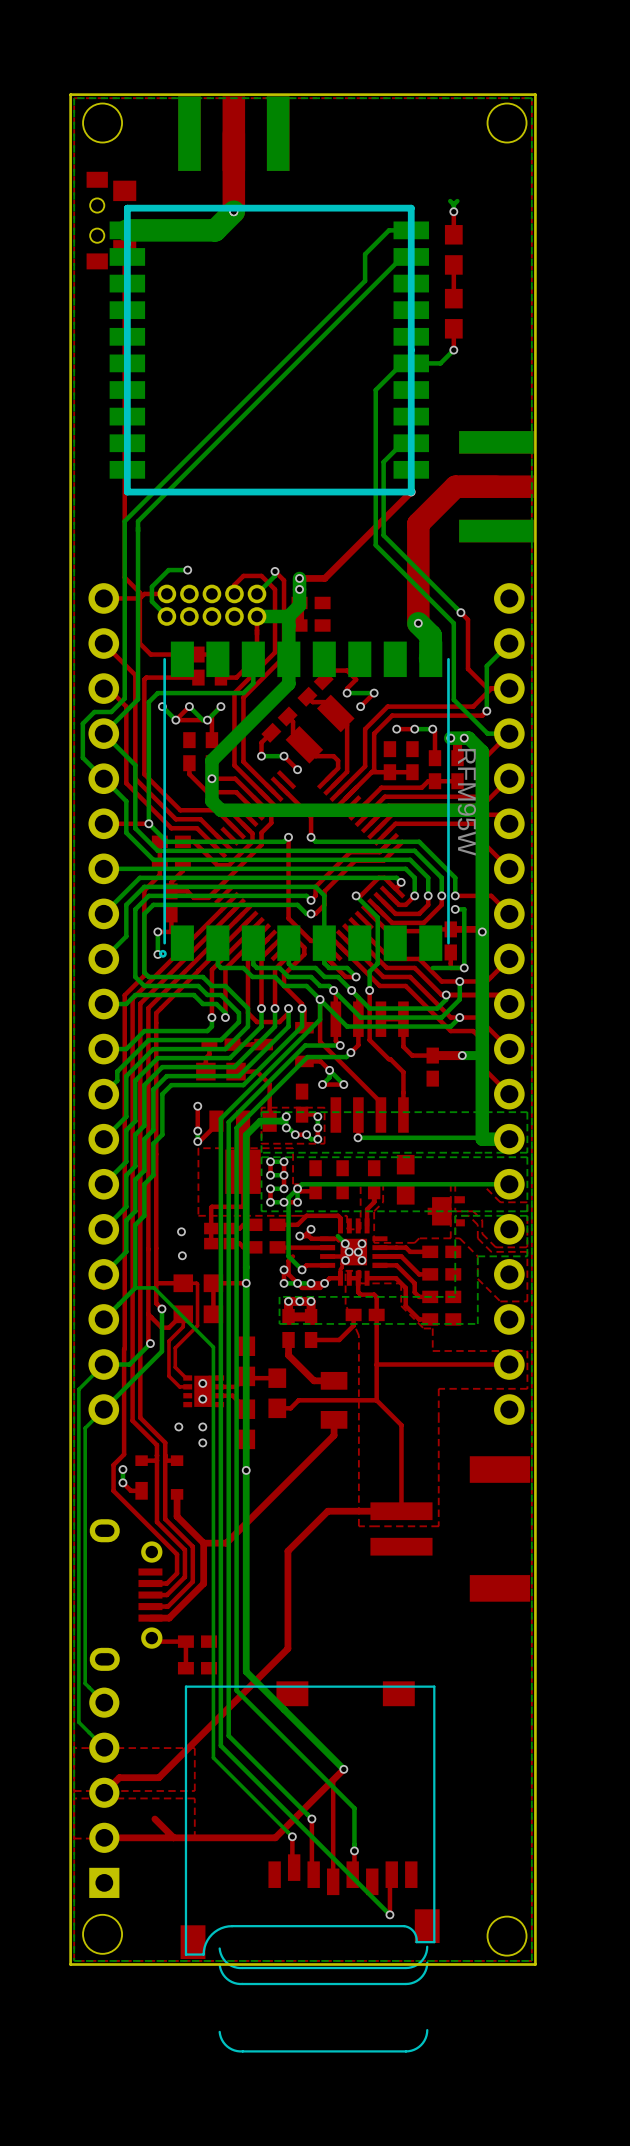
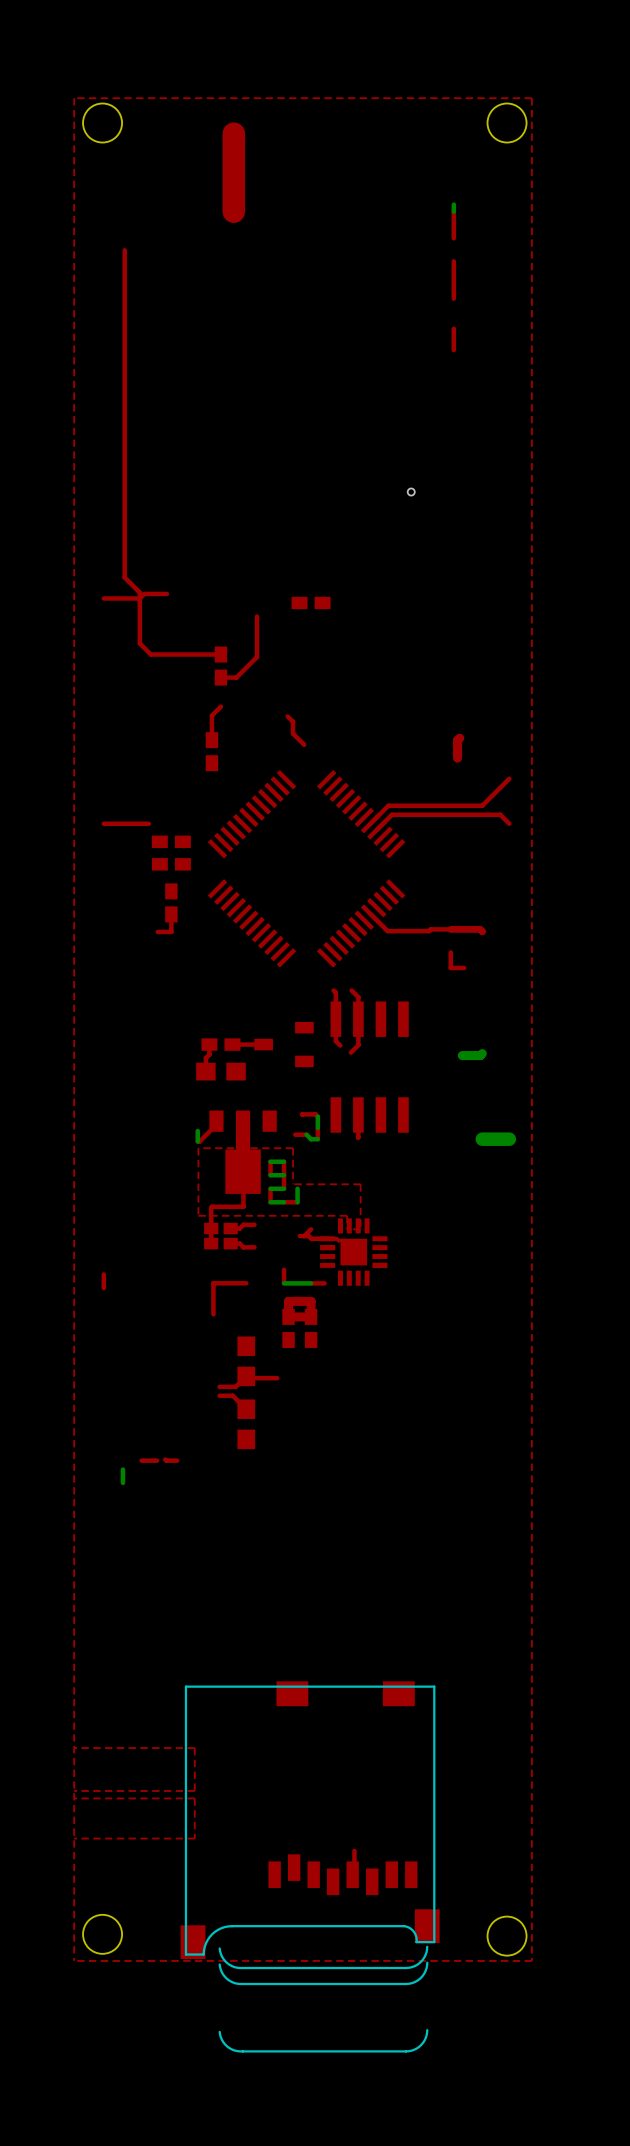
board edge: (535, 94) (535, 1964) (70, 1964) (70, 94) (535, 94) -> none
bottom zone outline: (531, 98) (74, 98) (74, 1960) (531, 1960) (531, 98) -> none
part: (233, 133) -> none
bottom track: (457, 201) (453, 204) (450, 201) -> none
bottom track: (233, 211) (215, 230) (127, 230) -> none
via: (233, 211) -> none
via: (453, 211) -> none
part: (111, 220) -> none
bottom track: (411, 230) (389, 230) (365, 254) (365, 280) (124, 521) (124, 698) (111, 712) (94, 712) (82, 723) (82, 757) (126, 801) (126, 832) (153, 859) (410, 859) (428, 877) (428, 895) -> none
part: (453, 249) -> none
bottom track: (411, 256) (402, 256) (138, 521) (138, 699) (103, 733) (135, 765) (135, 828) (157, 850) (414, 850) (441, 877) (441, 895) -> none
part: (453, 313) -> none
part: (269, 350) -> none
bottom track: (453, 350) (440, 363) (402, 363) (375, 390) (375, 545) (453, 623) (453, 699) (487, 733) (509, 733) -> none
via: (453, 350) -> none
bottom track: (408, 445) (411, 443) (402, 443) (383, 462) (383, 535) (460, 612) -> none
top track: (496, 486) (455, 486) (418, 523) (418, 623) -> none
part: (496, 486) -> none
top track: (411, 492) (324, 578) (299, 578) (299, 625) -> none
bottom track: (187, 570) (168, 570) (151, 586) (151, 601) (166, 616) -> none
via: (187, 570) -> none
top track: (275, 571) (284, 580) (284, 657) (243, 697) (243, 761) (273, 792) -> none
bottom track: (275, 571) (275, 575) (257, 593) -> none
via: (275, 571) -> none
bottom track: (299, 578) (299, 605) (288, 616) (288, 683) (211, 760) -> none
via: (299, 578) -> none
via: (299, 589) -> none
top track: (234, 593) (234, 584) (243, 575) (261, 575) (275, 589) (275, 652) (234, 693) (234, 765) (267, 798) -> none
part: (211, 605) -> none
top track: (460, 612) (468, 619) (468, 668) (487, 688) (509, 688) -> none
via: (460, 612) -> none
bottom track: (288, 616) (257, 616) -> none
bottom track: (418, 623) (430, 635) (430, 658) -> none
via: (418, 623) -> none
part: (311, 625) -> none
top track: (103, 643) (135, 675) (135, 778) (175, 819) (200, 819) (223, 842) -> none
bottom track: (509, 643) (486, 666) (486, 711) -> none
bottom track: (253, 659) (253, 683) (243, 693) (157, 693) (148, 702) (148, 823) (166, 841) (284, 841) (288, 837) -> none
part: (198, 666) -> none
top track: (198, 677) (146, 677) (144, 679) (144, 774) (180, 810) (216, 810) (236, 829) -> none
top track: (323, 680) (333, 670) (347, 670) (356, 679) (347, 688) (347, 693) -> none
top track: (103, 688) (108, 688) (126, 706) (126, 783) (171, 828) (197, 828) (217, 848) -> none
part: (315, 688) -> none
top track: (491, 688) (473, 706) (387, 706) (365, 729) (365, 766) (339, 792) -> none
via: (347, 693) -> none
top track: (374, 693) (360, 706) -> none
bottom track: (374, 693) (347, 693) -> none
via: (374, 693) -> none
top track: (307, 696) (312, 702) (324, 702) (347, 724) (347, 771) (332, 786) -> none
bottom track: (162, 706) (175, 720) -> none
via: (162, 706) -> none
top track: (189, 706) (175, 720) (207, 720) -> none
via: (189, 706) -> none
bottom track: (220, 706) (207, 720) (202, 720) (189, 706) -> none
via: (220, 706) -> none
via: (360, 706) -> none
top track: (486, 711) (482, 715) (392, 715) (374, 733) (374, 769) (345, 798) -> none
via: (486, 711) -> none
via: (175, 720) -> none
via: (207, 720) -> none
part: (279, 724) -> none
part: (320, 729) -> none
via: (396, 729) -> none
top track: (414, 729) (396, 729) -> none
via: (414, 729) -> none
top track: (432, 729) (434, 731) (434, 758) -> none
bottom track: (432, 729) (414, 729) -> none
via: (432, 729) -> none
top track: (271, 732) (261, 742) (261, 756) -> none
top track: (509, 733) (486, 756) (486, 787) (477, 796) (384, 796) (364, 817) -> none
bottom track: (450, 738) (468, 738) (482, 751) (482, 1139) (482, 931) -> none
via: (450, 738) -> none
via: (464, 738) -> none
top track: (304, 744) (315, 756) (333, 756) (338, 760) (338, 768) (326, 779) -> none
part: (189, 751) -> none
via: (261, 756) -> none
top track: (284, 756) (297, 769) -> none
bottom track: (284, 756) (261, 756) -> none
via: (284, 756) -> none
bottom track: (211, 760) (211, 801) (220, 810) (482, 810) -> none
part: (389, 760) -> none
part: (412, 760) -> none
top track: (189, 763) (189, 774) (207, 792) (236, 792) (255, 811) -> none
via: (297, 769) -> none
part: (434, 769) -> none
part: (457, 769) -> none
top track: (412, 772) (371, 772) -> none
top track: (211, 774) (211, 763) (211, 778) (235, 778) (271, 814) (271, 822) (261, 832) (261, 844) (208, 897) (193, 897) (187, 891) (171, 891) (171, 882) (182, 870) (182, 864) -> none
via: (211, 778) -> none
top track: (457, 781) (428, 781) (421, 787) (381, 787) (358, 811) -> none
top track: (280, 786) (311, 816) (311, 837) -> none
part: RFM95W (304, 801) -> none
via: (148, 823) -> none
top track: (242, 823) (252, 833) (252, 841) (229, 865) (217, 865) (193, 841) (182, 841) -> none
top track: (383, 836) (395, 823) (482, 823) (486, 828) (486, 846) (509, 868) -> none
top track: (288, 837) (288, 918) (311, 940) (322, 940) (332, 951) -> none
via: (288, 837) -> none
bottom track: (311, 837) (315, 841) (419, 841) (455, 877) (455, 895) -> none
via: (311, 837) -> none
top track: (159, 841) (159, 875) (144, 890) (144, 975) (124, 995) (124, 1454) (113, 1465) (113, 1490) (177, 1554) (177, 1573) (166, 1583) (150, 1583) -> none
top track: (389, 842) (379, 852) (350, 852) (315, 886) (315, 895) (311, 900) -> none
top track: (395, 848) (383, 860) (355, 860) (324, 891) (324, 904) (315, 913) (311, 913) -> none
bottom track: (103, 868) (405, 868) (414, 877) (414, 895) -> none
top track: (401, 882) (395, 888) (384, 877) (378, 877) (360, 895) (356, 895) -> none
bottom track: (401, 882) (396, 877) (139, 877) (103, 913) -> none
via: (401, 882) -> none
bottom track: (356, 895) (377, 917) (377, 963) (369, 971) (369, 990) -> none
via: (356, 895) -> none
top track: (389, 895) (399, 904) (405, 904) (414, 895) -> none
via: (414, 895) -> none
top track: (428, 895) (428, 904) (419, 913) (395, 913) (383, 901) -> none
via: (428, 895) -> none
top track: (441, 895) (441, 904) (423, 922) (392, 922) (377, 907) -> none
via: (441, 895) -> none
top track: (455, 895) (491, 895) (509, 913) -> none
via: (455, 895) -> none
bottom track: (311, 900) (306, 895) (148, 895) (135, 909) (135, 976) (144, 985) (198, 985) (207, 995) (220, 995) (238, 1013) (238, 1022) (220, 1040) (148, 1040) (117, 1071) (117, 1080) (103, 1094) -> none
via: (311, 900) -> none
top track: (230, 901) (132, 998) (132, 1420) (156, 1445) (156, 1522) (184, 1549) (184, 1577) (166, 1595) (150, 1595) -> none
top track: (236, 907) (140, 1003) (140, 1417) (165, 1442) (165, 1519) (192, 1546) (192, 1581) (167, 1606) (150, 1606) -> none
bottom track: (455, 909) (464, 909) (464, 967) (432, 967) -> none
via: (455, 909) -> none
top track: (242, 913) (148, 1008) (148, 1341) (150, 1343) -> none
bottom track: (311, 913) (306, 913) (297, 904) (153, 904) (144, 913) (144, 972) (148, 976) (202, 976) (211, 985) (225, 985) (247, 1008) (247, 1026) (225, 1049) (153, 1049) (126, 1076) (126, 1116) (103, 1139) (103, 1130) -> none
via: (311, 913) -> none
top track: (248, 920) (156, 1013) (156, 1303) (161, 1308) -> none
top track: (255, 926) (211, 969) (211, 1017) -> none
top track: (358, 926) (390, 958) (419, 958) (441, 981) (486, 981) (509, 958) -> none
bottom track: (157, 931) (157, 954) -> none
via: (157, 931) -> none
via: (482, 931) -> none
top track: (261, 932) (225, 968) (225, 1017) -> none
top track: (351, 932) (386, 967) (414, 967) (441, 995) (504, 995) -> none
top track: (267, 939) (247, 958) (247, 1013) (257, 1022) (279, 1022) (288, 1013) (288, 1008) -> none
top track: (345, 939) (383, 976) (410, 976) (450, 1017) (477, 1017) (509, 1049) -> none
part: (450, 940) -> none
bottom track: (217, 943) (217, 964) (220, 967) (243, 967) (252, 976) (275, 976) (284, 985) (306, 985) (347, 1026) (450, 1026) (459, 1017) -> none
bottom track: (253, 943) (253, 964) (257, 967) (279, 967) (288, 976) (311, 976) (320, 985) (329, 985) (360, 1017) (441, 1017) (459, 999) (459, 981) -> none
bottom track: (288, 943) (288, 963) (293, 967) (315, 967) (324, 976) (338, 976) (369, 1008) (437, 1008) (446, 999) (446, 995) -> none
top track: (273, 945) (261, 957) (261, 1008) -> none
top track: (339, 945) (379, 985) (405, 985) (450, 1031) (473, 1031) (486, 1044) (486, 1071) (509, 1094) -> none
top track: (280, 951) (290, 940) (297, 940) (304, 947) (304, 954) (284, 974) (284, 985) (302, 1004) (304, 1010) (304, 1027) -> none
bottom track: (103, 954) (103, 958) (126, 936) (126, 904) (144, 886) (315, 886) (324, 895) (324, 963) (329, 967) (347, 967) (356, 976) -> none
via: (157, 954) -> none
top track: (286, 957) (275, 969) (275, 1008) -> none
top track: (326, 957) (345, 976) (356, 976) -> none
via: (464, 967) -> none
via: (356, 976) -> none
via: (459, 981) -> none
via: (333, 990) -> none
via: (351, 990) -> none
top track: (369, 990) (369, 1040) (403, 1072) (403, 1115) -> none
via: (369, 990) -> none
via: (446, 995) -> none
top track: (320, 999) (320, 1041) (380, 1102) (380, 1115) -> none
bottom track: (320, 999) (320, 1019) (220, 1118) (220, 1745) (389, 1914) -> none
via: (320, 999) -> none
bottom track: (103, 1004) (126, 1004) (135, 995) (193, 995) (202, 1004) (216, 1004) (225, 1013) (225, 1017) -> none
part: (103, 1004) -> none
part: (509, 1004) -> none
bottom track: (261, 1008) (261, 1026) (229, 1058) (157, 1058) (135, 1080) (135, 1121) (126, 1130) (126, 1161) (103, 1184) (103, 1179) -> none
via: (261, 1008) -> none
bottom track: (275, 1008) (275, 1026) (234, 1067) (162, 1067) (144, 1085) (144, 1125) (135, 1134) (135, 1166) (126, 1175) (126, 1206) (103, 1229) -> none
via: (275, 1008) -> none
bottom track: (288, 1008) (288, 1026) (238, 1076) (166, 1076) (153, 1089) (153, 1130) (144, 1139) (144, 1170) (135, 1179) (135, 1211) (126, 1220) (126, 1251) (103, 1274) -> none
via: (288, 1008) -> none
bottom track: (302, 1008) (302, 1026) (243, 1085) (171, 1085) (162, 1094) (162, 1134) (153, 1143) (153, 1175) (144, 1184) (144, 1215) (135, 1224) (135, 1287) -> none
via: (302, 1008) -> none
bottom track: (211, 1017) (211, 1026) (207, 1031) (144, 1031) (126, 1049) (103, 1049) -> none
via: (211, 1017) -> none
via: (225, 1017) -> none
via: (459, 1017) -> none
top track: (380, 1019) (403, 1019) (403, 1046) (412, 1055) (462, 1055) -> none
bottom track: (340, 1045) (305, 1045) (228, 1122) (228, 1735) (311, 1819) -> none
via: (340, 1045) -> none
bottom track: (350, 1052) (346, 1057) (307, 1057) (236, 1127) (236, 1690) (354, 1808) (354, 1850) -> none
via: (350, 1052) -> none
via: (462, 1055) -> none
top track: (304, 1061) (320, 1061) (329, 1070) -> none
part: (432, 1067) -> none
via: (329, 1070) -> none
top track: (236, 1071) (257, 1071) (269, 1084) (269, 1121) -> none
via: (322, 1084) -> none
top track: (343, 1084) (322, 1084) -> none
bottom track: (343, 1084) (329, 1070) (329, 1077) (322, 1084) -> none
via: (343, 1084) -> none
part: (302, 1103) -> none
top track: (197, 1106) (197, 1131) -> none
via: (197, 1106) -> none
top zone outline: (324, 1107) (324, 1143) (261, 1143) (261, 1107) (324, 1107) -> none
bottom zone outline: (527, 1112) (527, 1152) (261, 1152) (261, 1112) (527, 1112) -> none
via: (286, 1116) -> none
via: (317, 1116) -> none
via: (286, 1127) -> none
via: (317, 1127) -> none
via: (197, 1131) -> none
bottom track: (295, 1134) (286, 1127) (286, 1116) (281, 1121) (260, 1121) (246, 1135) (246, 1671) (343, 1769) -> none
via: (295, 1134) -> none
via: (306, 1134) -> none
via: (358, 1137) -> none
bottom track: (507, 1137) (358, 1137) -> none
via: (317, 1139) -> none
via: (197, 1141) -> none
bottom zone outline: (527, 1157) (527, 1211) (261, 1211) (261, 1157) (527, 1157) -> none
via: (270, 1161) -> none
via: (284, 1161) -> none
via: (270, 1175) -> none
via: (284, 1175) -> none
part: (315, 1179) -> none
part: (342, 1179) -> none
part: (374, 1179) -> none
part: (405, 1179) -> none
top zone outline: (450, 1184) (383, 1184) (383, 1202) (374, 1211) (374, 1242) (414, 1242) (419, 1238) (450, 1238) (450, 1184) -> none
top zone outline: (482, 1184) (455, 1184) (455, 1211) (473, 1211) (482, 1220) (482, 1233) (495, 1247) (527, 1247) (527, 1202) (500, 1202) (482, 1184) -> none
bottom track: (509, 1184) (302, 1184) (288, 1197) (288, 1256) (302, 1269) -> none
via: (270, 1188) -> none
via: (284, 1188) -> none
top track: (297, 1188) (300, 1191) (315, 1191) -> none
via: (297, 1188) -> none
top track: (374, 1191) (374, 1202) (367, 1209) (367, 1225) -> none
via: (270, 1202) -> none
via: (284, 1202) -> none
via: (297, 1202) -> none
part: (446, 1211) -> none
top zone outline: (468, 1215) (455, 1215) (455, 1238) (459, 1238) (477, 1256) (477, 1278) (500, 1301) (527, 1301) (527, 1251) (491, 1251) (477, 1238) (477, 1224) (468, 1215) -> none
bottom zone outline: (527, 1215) (527, 1256) (477, 1256) (477, 1323) (279, 1323) (279, 1296) (455, 1296) (455, 1215) (527, 1215) -> none
part: (266, 1224) -> none
top track: (277, 1224) (297, 1224) (306, 1215) (338, 1215) (340, 1218) (340, 1225) -> none
via: (311, 1229) -> none
via: (181, 1231) -> none
via: (299, 1236) -> none
bottom track: (337, 1236) (347, 1245) -> none
via: (345, 1243) -> none
via: (361, 1243) -> none
part: (266, 1247) -> none
top track: (277, 1247) (327, 1247) -> none
top track: (379, 1247) (405, 1247) (410, 1251) (430, 1251) -> none
via: (349, 1251) -> none
part: (441, 1251) -> none
via: (358, 1252) -> none
via: (182, 1255) -> none
top track: (327, 1256) (344, 1256) (347, 1258) (342, 1263) (340, 1278) (329, 1278) (320, 1287) (302, 1287) (288, 1274) (288, 1260) (292, 1256) -> none
top track: (379, 1256) (401, 1256) (419, 1274) (430, 1274) -> none
via: (345, 1260) -> none
via: (361, 1260) -> none
top track: (327, 1265) (306, 1265) (302, 1269) -> none
top track: (379, 1265) (396, 1265) (414, 1283) (414, 1292) (419, 1296) (430, 1296) -> none
via: (284, 1269) -> none
via: (302, 1269) -> none
top zone outline: (360, 1270) (360, 1283) (401, 1283) (401, 1305) (423, 1328) (432, 1328) (432, 1350) (527, 1350) (527, 1388) (438, 1388) (438, 1526) (358, 1526) (358, 1335) (345, 1304) (345, 1270) (360, 1270) -> none
part: (441, 1274) -> none
top track: (349, 1278) (358, 1278) (358, 1292) (360, 1294) (374, 1294) (376, 1297) (376, 1400) -> none
top track: (367, 1278) (396, 1278) (405, 1287) (405, 1305) (419, 1319) (430, 1319) -> none
top track: (156, 1283) (197, 1284) (197, 1325) (175, 1348) (175, 1367) (187, 1377) -> none
part: (198, 1283) -> none
via: (246, 1283) -> none
via: (284, 1283) -> none
via: (297, 1283) -> none
via: (311, 1283) -> none
via: (324, 1283) -> none
bottom track: (135, 1287) (103, 1319) -> none
bottom track: (135, 1287) (154, 1287) (213, 1347) (213, 1757) (292, 1836) -> none
part: (441, 1296) -> none
via: (288, 1301) -> none
via: (299, 1301) -> none
via: (311, 1301) -> none
bottom track: (161, 1308) (161, 1351) (103, 1409) -> none
via: (161, 1308) -> none
top track: (148, 1314) (161, 1327) (169, 1327) (183, 1314) (183, 1326) (168, 1341) (168, 1376) (179, 1386) (187, 1386) -> none
part: (198, 1314) -> none
top track: (353, 1314) (353, 1325) (339, 1339) (311, 1339) -> none
part: (365, 1314) -> none
part: (441, 1319) -> none
top track: (288, 1339) (288, 1355) (314, 1380) (334, 1380) -> none
bottom track: (150, 1343) (129, 1364) (103, 1364) (78, 1389) (78, 1722) (104, 1747) -> none
via: (150, 1343) -> none
top track: (509, 1364) (376, 1364) -> none
via: (202, 1383) -> none
part: (203, 1391) -> none
part: (277, 1393) -> none
via: (202, 1399) -> none
part: (334, 1400) -> none
top track: (376, 1400) (298, 1400) (290, 1408) (277, 1408) -> none
top track: (376, 1400) (401, 1425) (401, 1511) (327, 1511) (287, 1551) (287, 1648) (158, 1777) (119, 1777) (104, 1792) -> none
bottom track: (103, 1409) (85, 1428) (85, 1683) (104, 1702) -> none
top track: (334, 1419) (334, 1435) (226, 1543) (203, 1543) -> none
via: (178, 1426) -> none
via: (202, 1426) -> none
via: (202, 1442) -> none
via: (122, 1469) -> none
via: (246, 1470) -> none
part: (159, 1477) -> none
top track: (122, 1482) (130, 1490) (141, 1490) -> none
via: (122, 1482) -> none
top track: (177, 1494) (177, 1516) (203, 1543) -> none
part: (450, 1528) -> none
top track: (203, 1543) (203, 1583) (169, 1618) (150, 1618) -> none
part: (126, 1595) -> none
top track: (151, 1638) (155, 1641) (185, 1641) (185, 1668) -> none
part: (197, 1641) -> none
part: (197, 1668) -> none
via: (343, 1769) -> none
part: (104, 1792) -> none
top track: (154, 1819) (173, 1837) -> none
top track: (311, 1819) (311, 1872) (313, 1874) -> none
via: (311, 1819) -> none
top track: (292, 1836) (292, 1865) (294, 1867) -> none
via: (292, 1836) -> none
top track: (104, 1837) (275, 1837) (343, 1769) (333, 1779) (333, 1888) -> none
via: (354, 1850) -> none
top track: (391, 1874) (389, 1876) (389, 1914) -> none
via: (389, 1914) -> none

